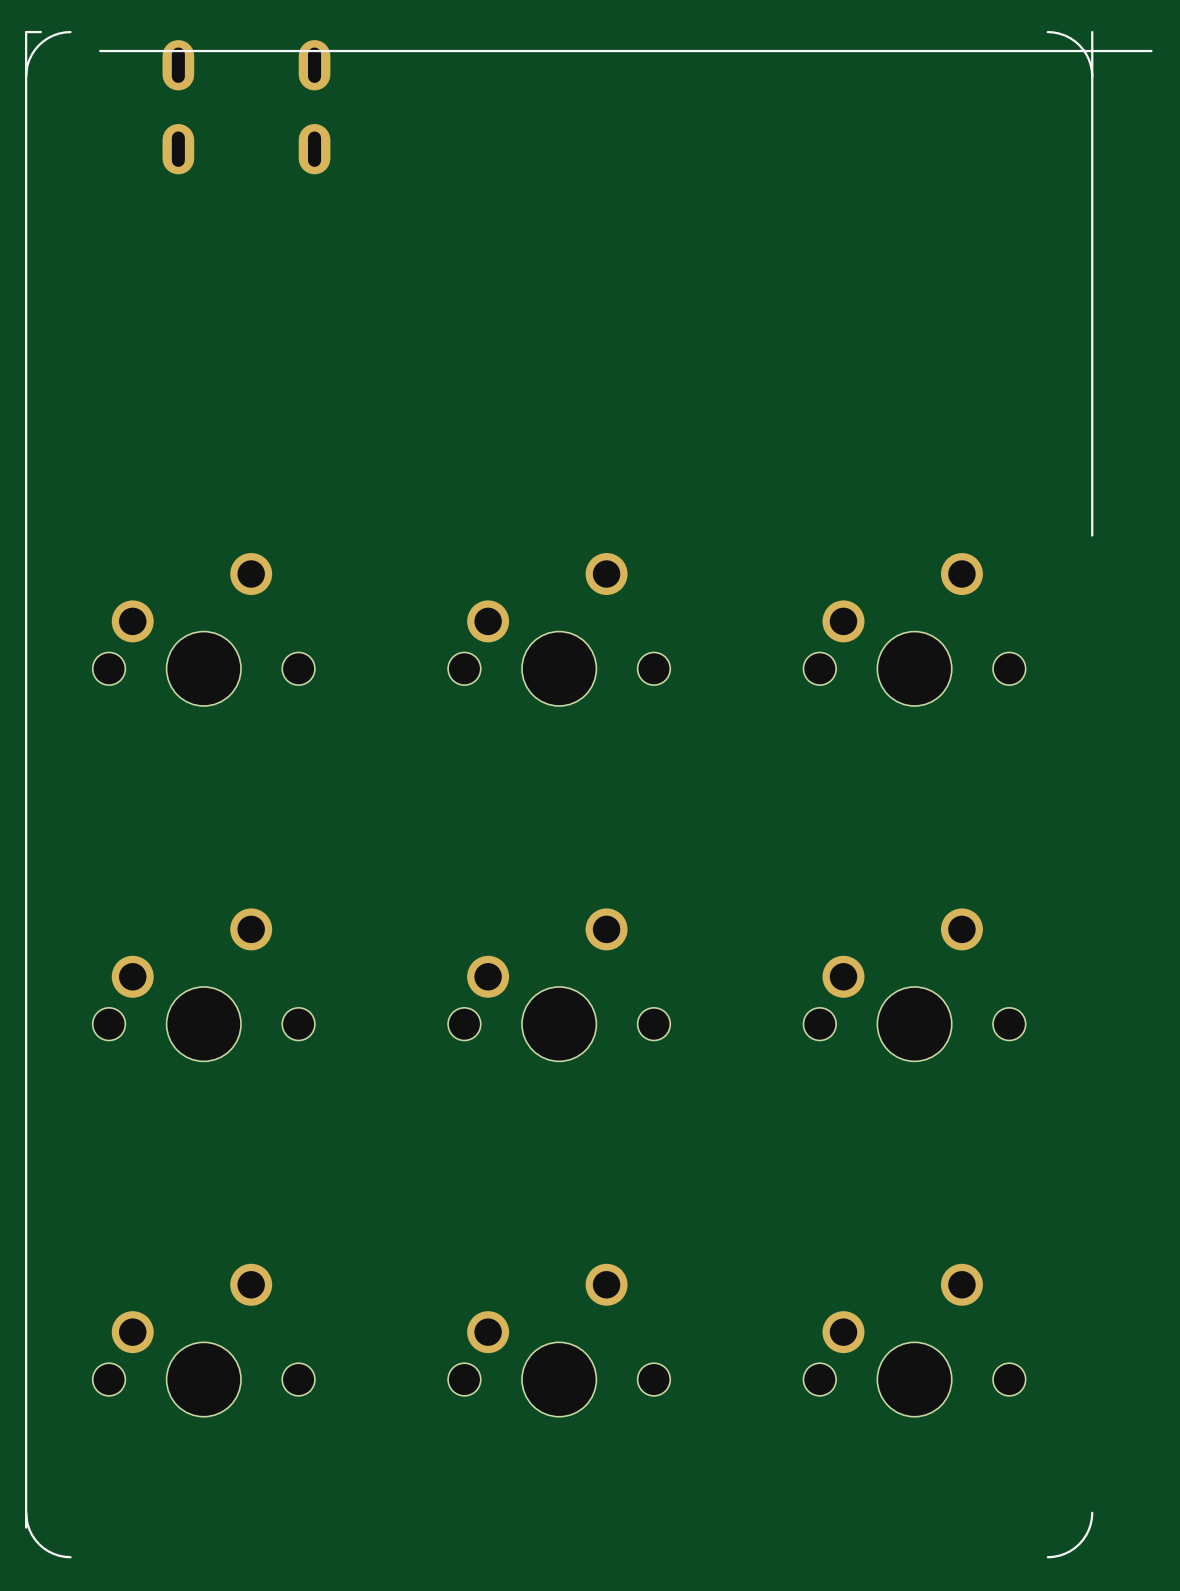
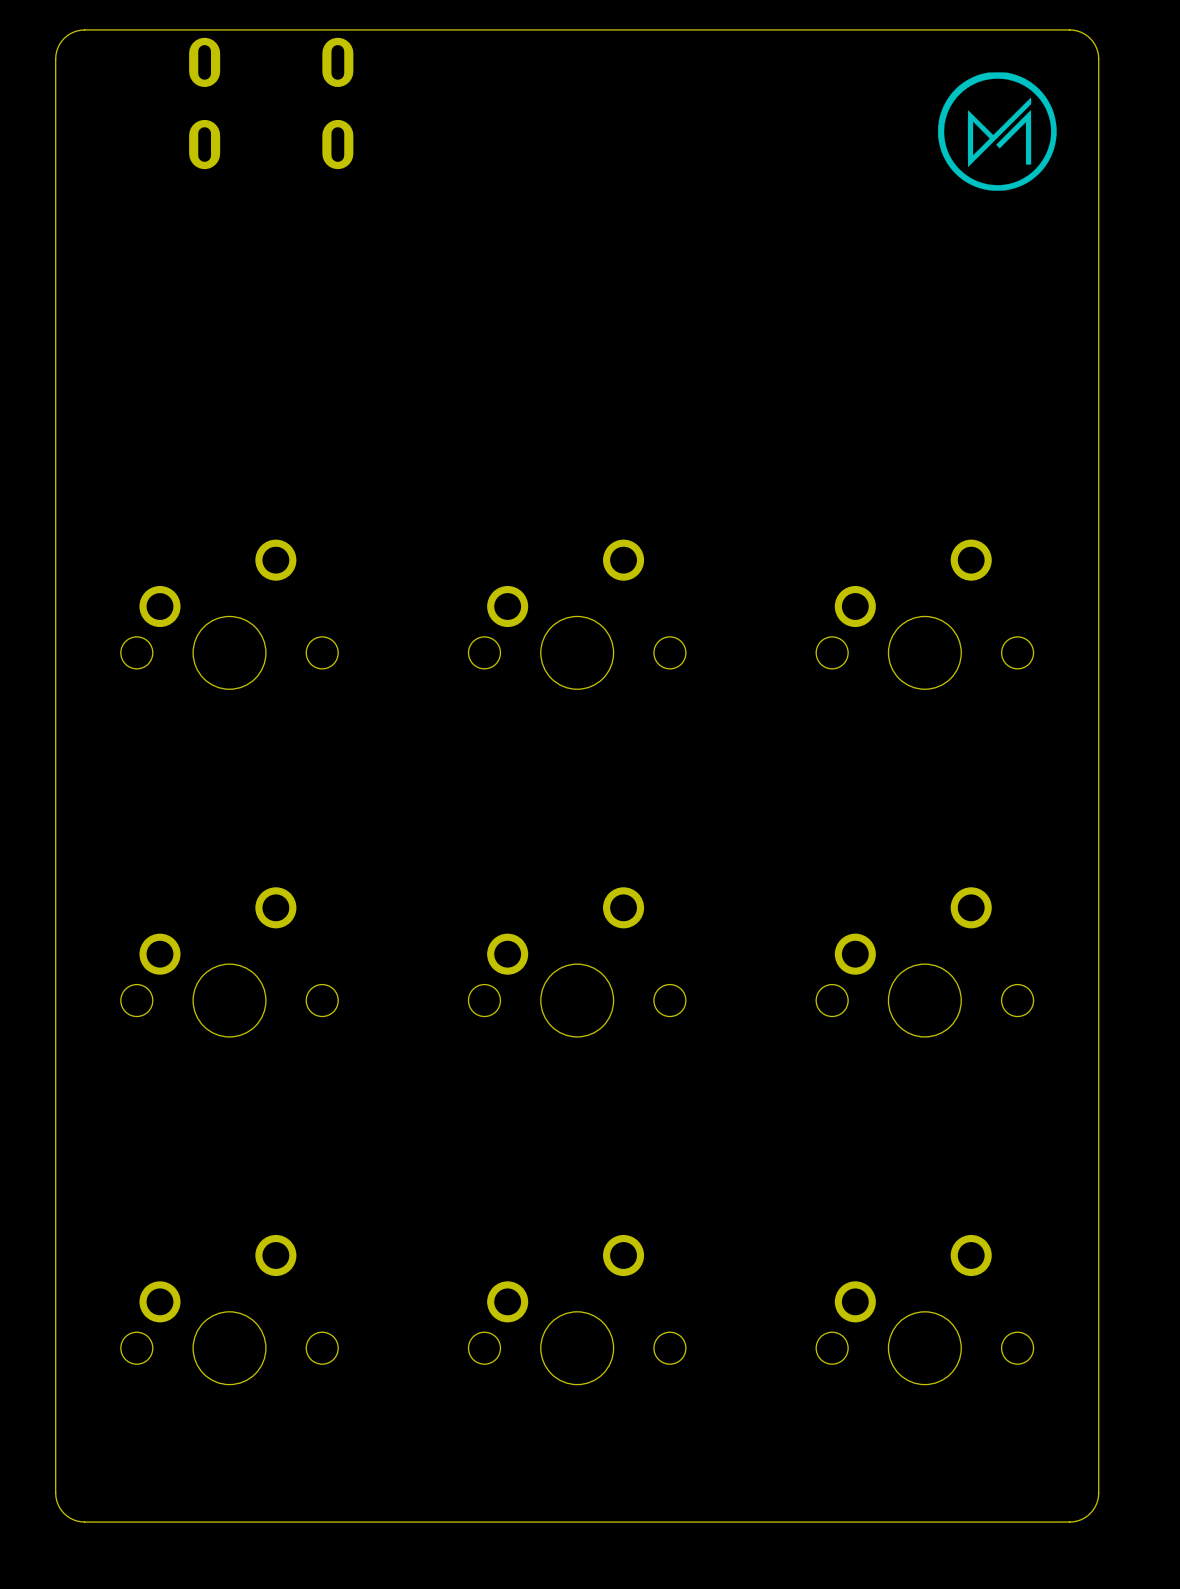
line: (40, 32) (26, 32) (26, 1527) -> none
board edge: none -> (84, 29) (1069, 29) (1084, 33) (1092, 41) (1098, 58) (1098, 1493) (1096, 1504) (1087, 1516) (1069, 1522) (84, 1522) (70, 1518) (61, 1510) (55, 1493) (55, 58) (57, 47) (64, 38) (73, 32) (84, 29)
line: (70, 32) (53, 35) (39, 45) (29, 59) (26, 76) -> none
line: (1047, 32) (1064, 35) (1079, 45) (1088, 59) (1092, 76) -> none
line: (1092, 32) (1092, 535) -> none
line: (100, 51) (1151, 51) -> none
drawing: none -> [938, 72, 1057, 191]
line: (26, 1512) (29, 1529) (39, 1544) (53, 1553) (70, 1557) -> none
line: (1092, 1512) (1088, 1529) (1079, 1544) (1064, 1553) (1047, 1557) -> none

